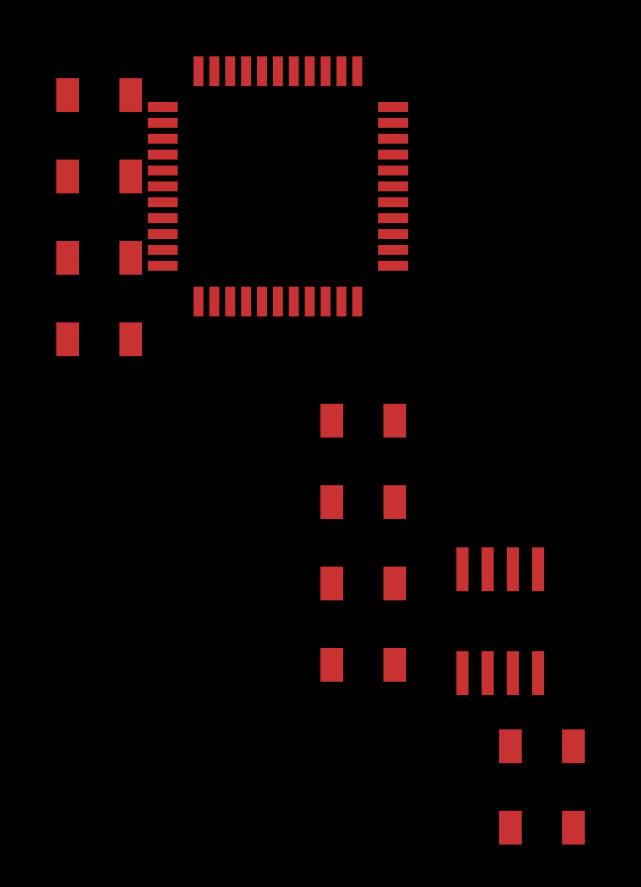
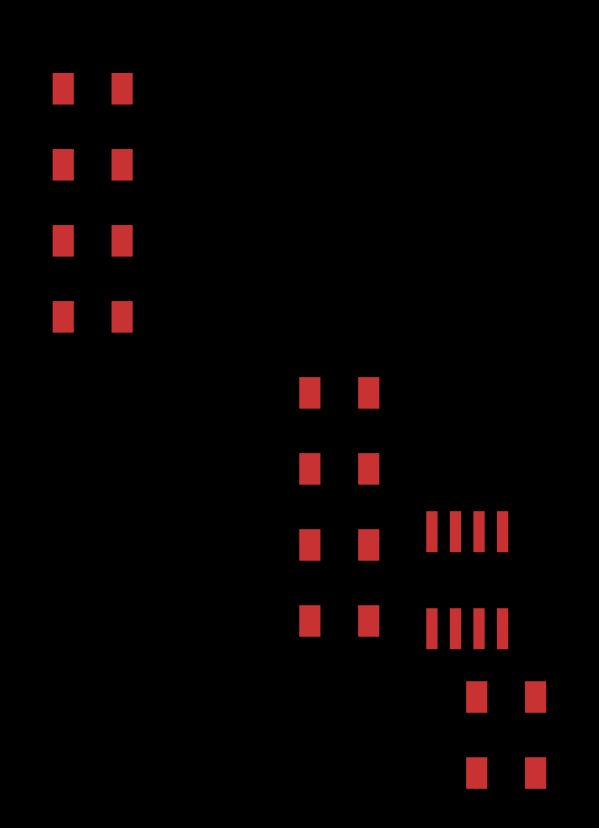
part: (277, 186) -> none

